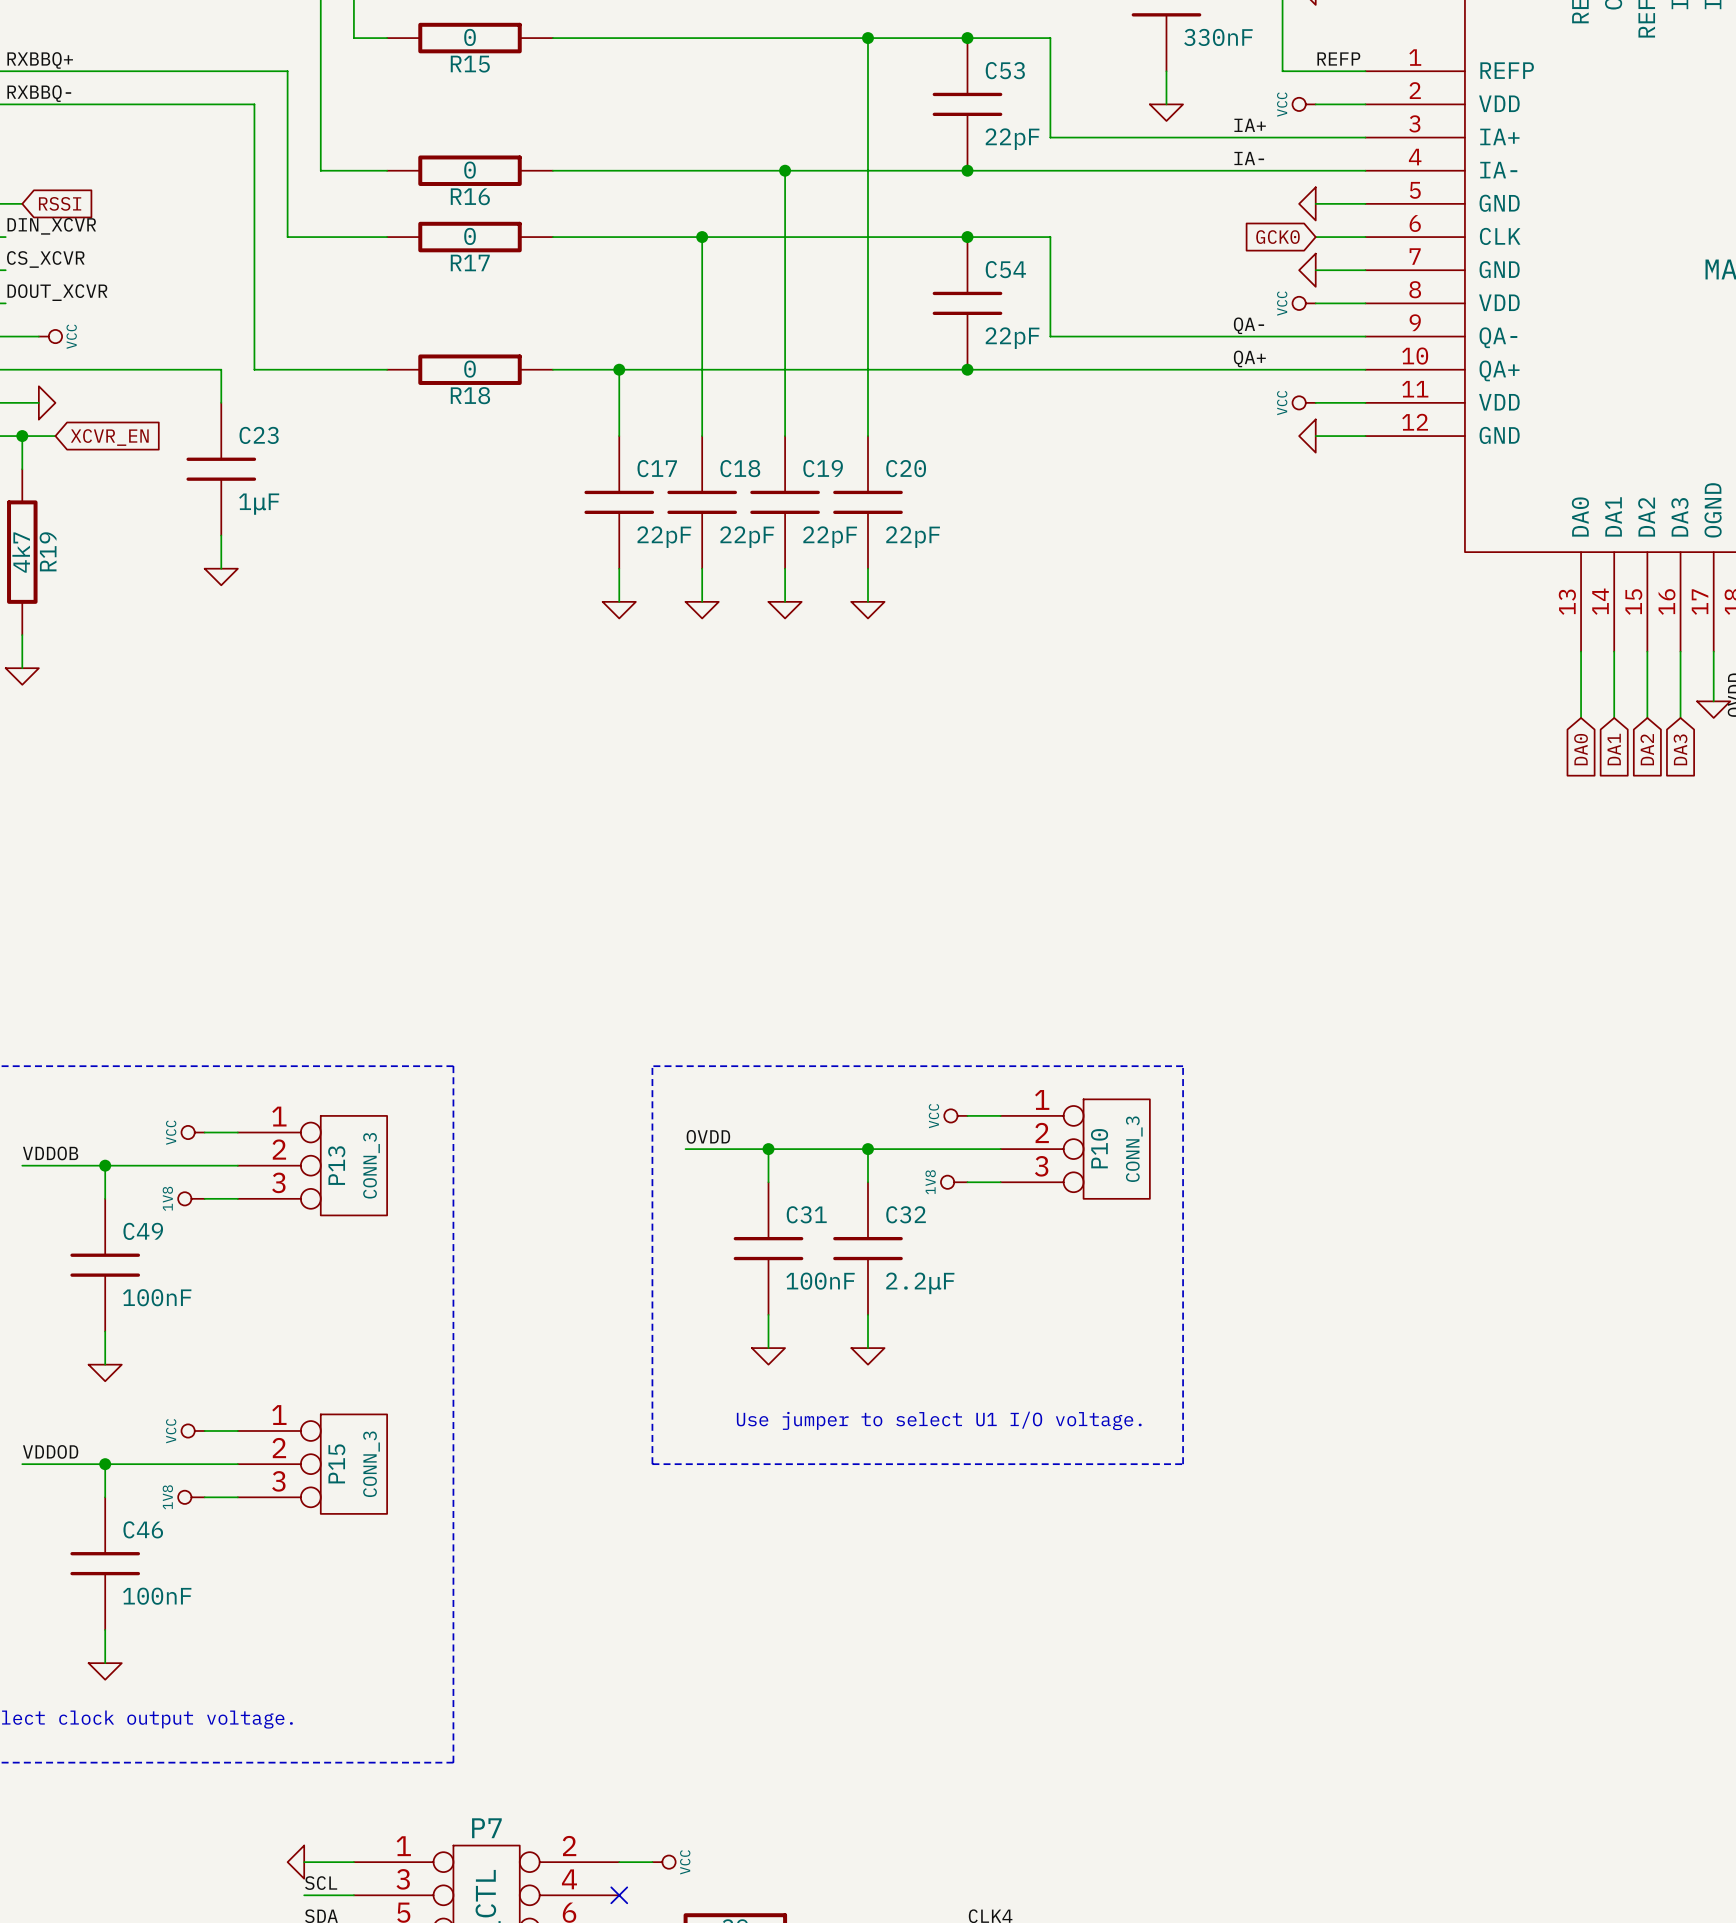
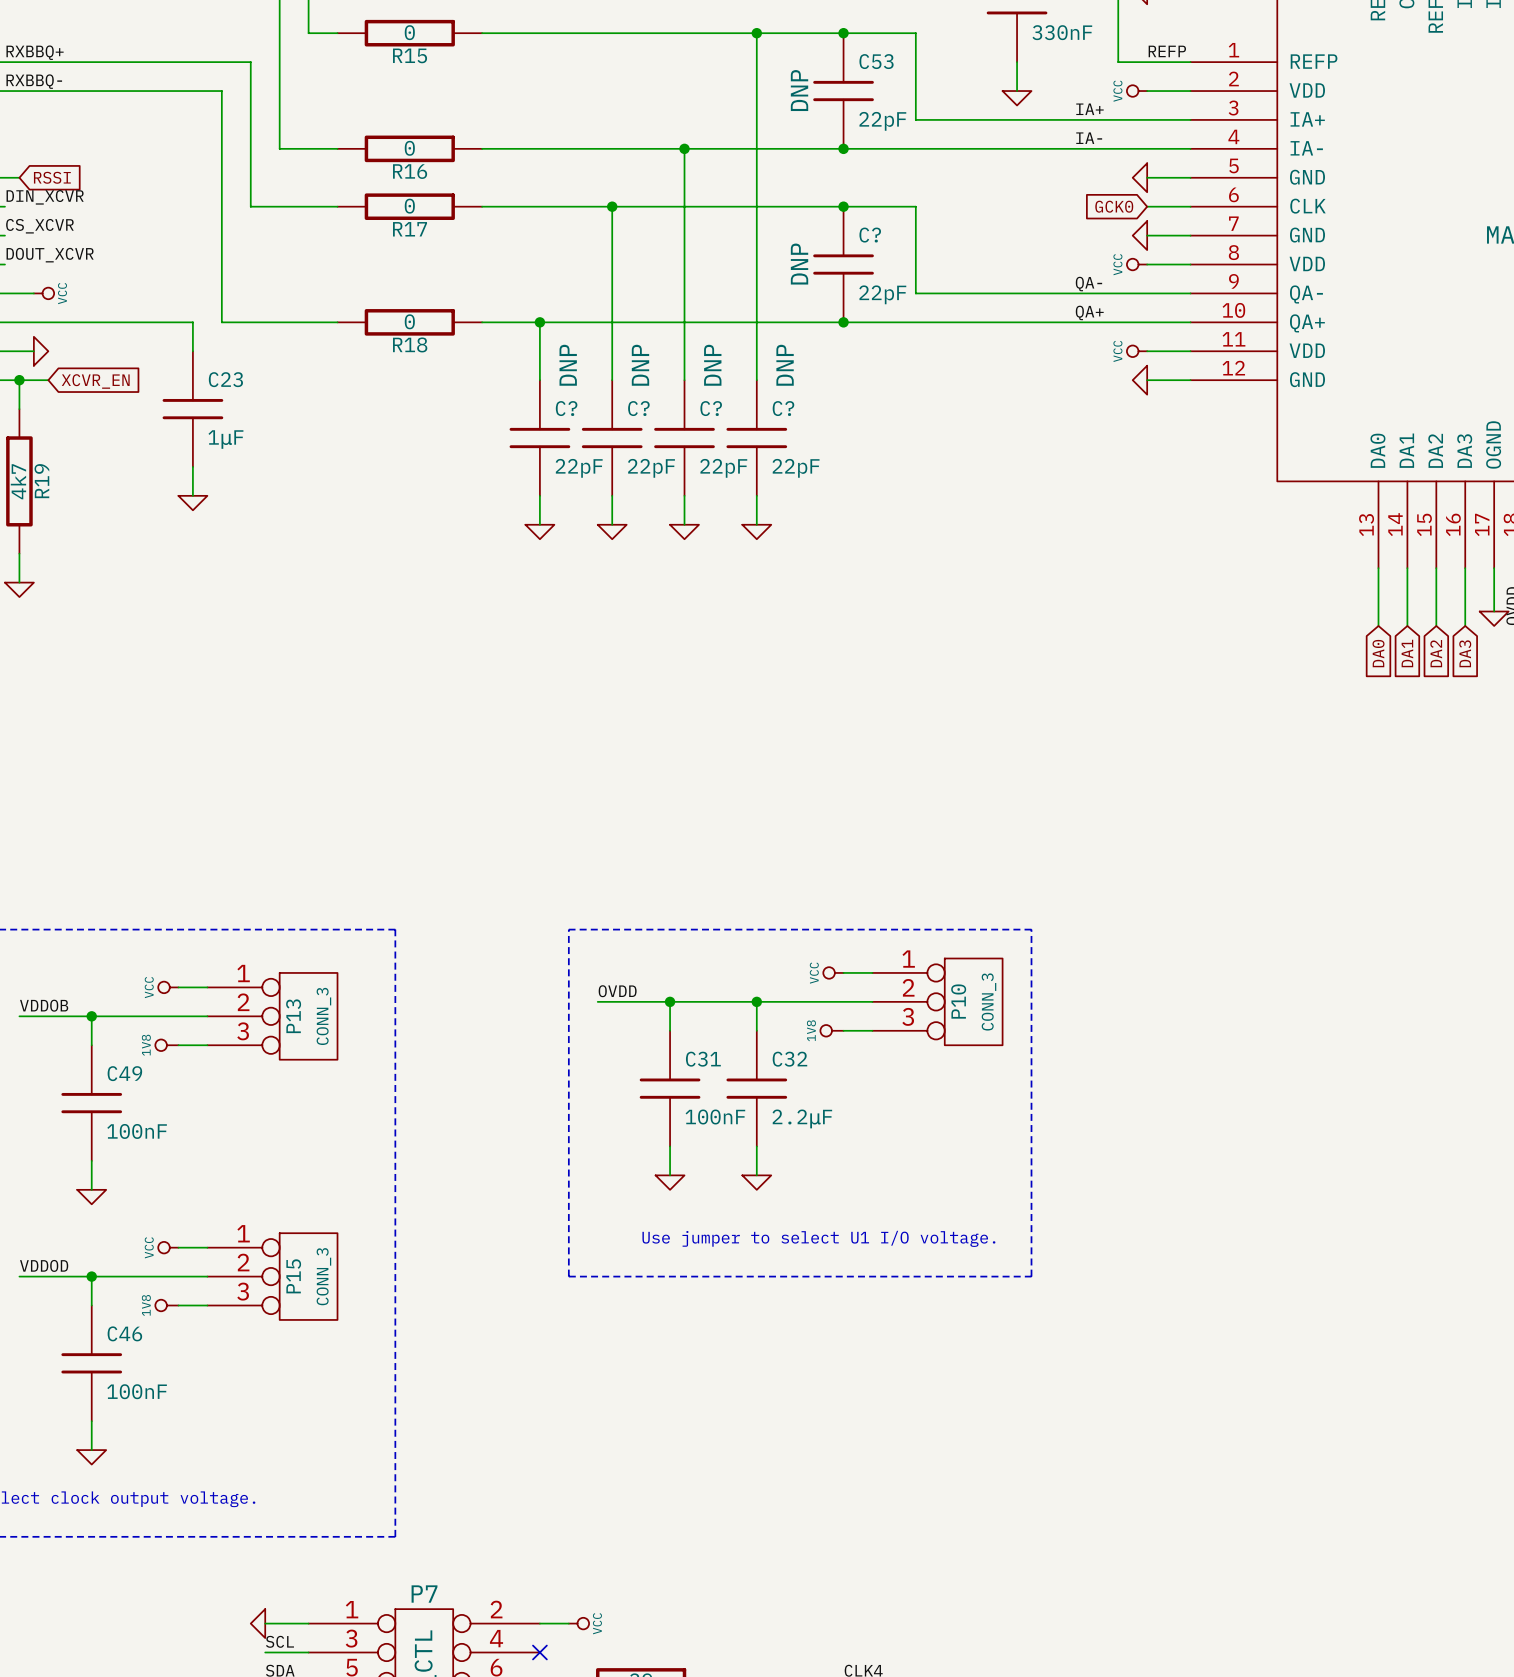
C53 text: none -> DNP (799, 90)
C54 name: C54 (1005, 269) -> C? (870, 235)
C54 text: none -> DNP (799, 264)
C17 text: none -> DNP (568, 365)
C18 text: none -> DNP (640, 365)
C19 text: none -> DNP (712, 365)
C20 text: none -> DNP (785, 365)
C17 name: C17 (657, 468) -> C? (566, 408)
C18 name: C18 (740, 468) -> C? (638, 408)
C19 name: C19 (823, 468) -> C? (711, 408)
C20 name: C20 (906, 468) -> C? (783, 408)

